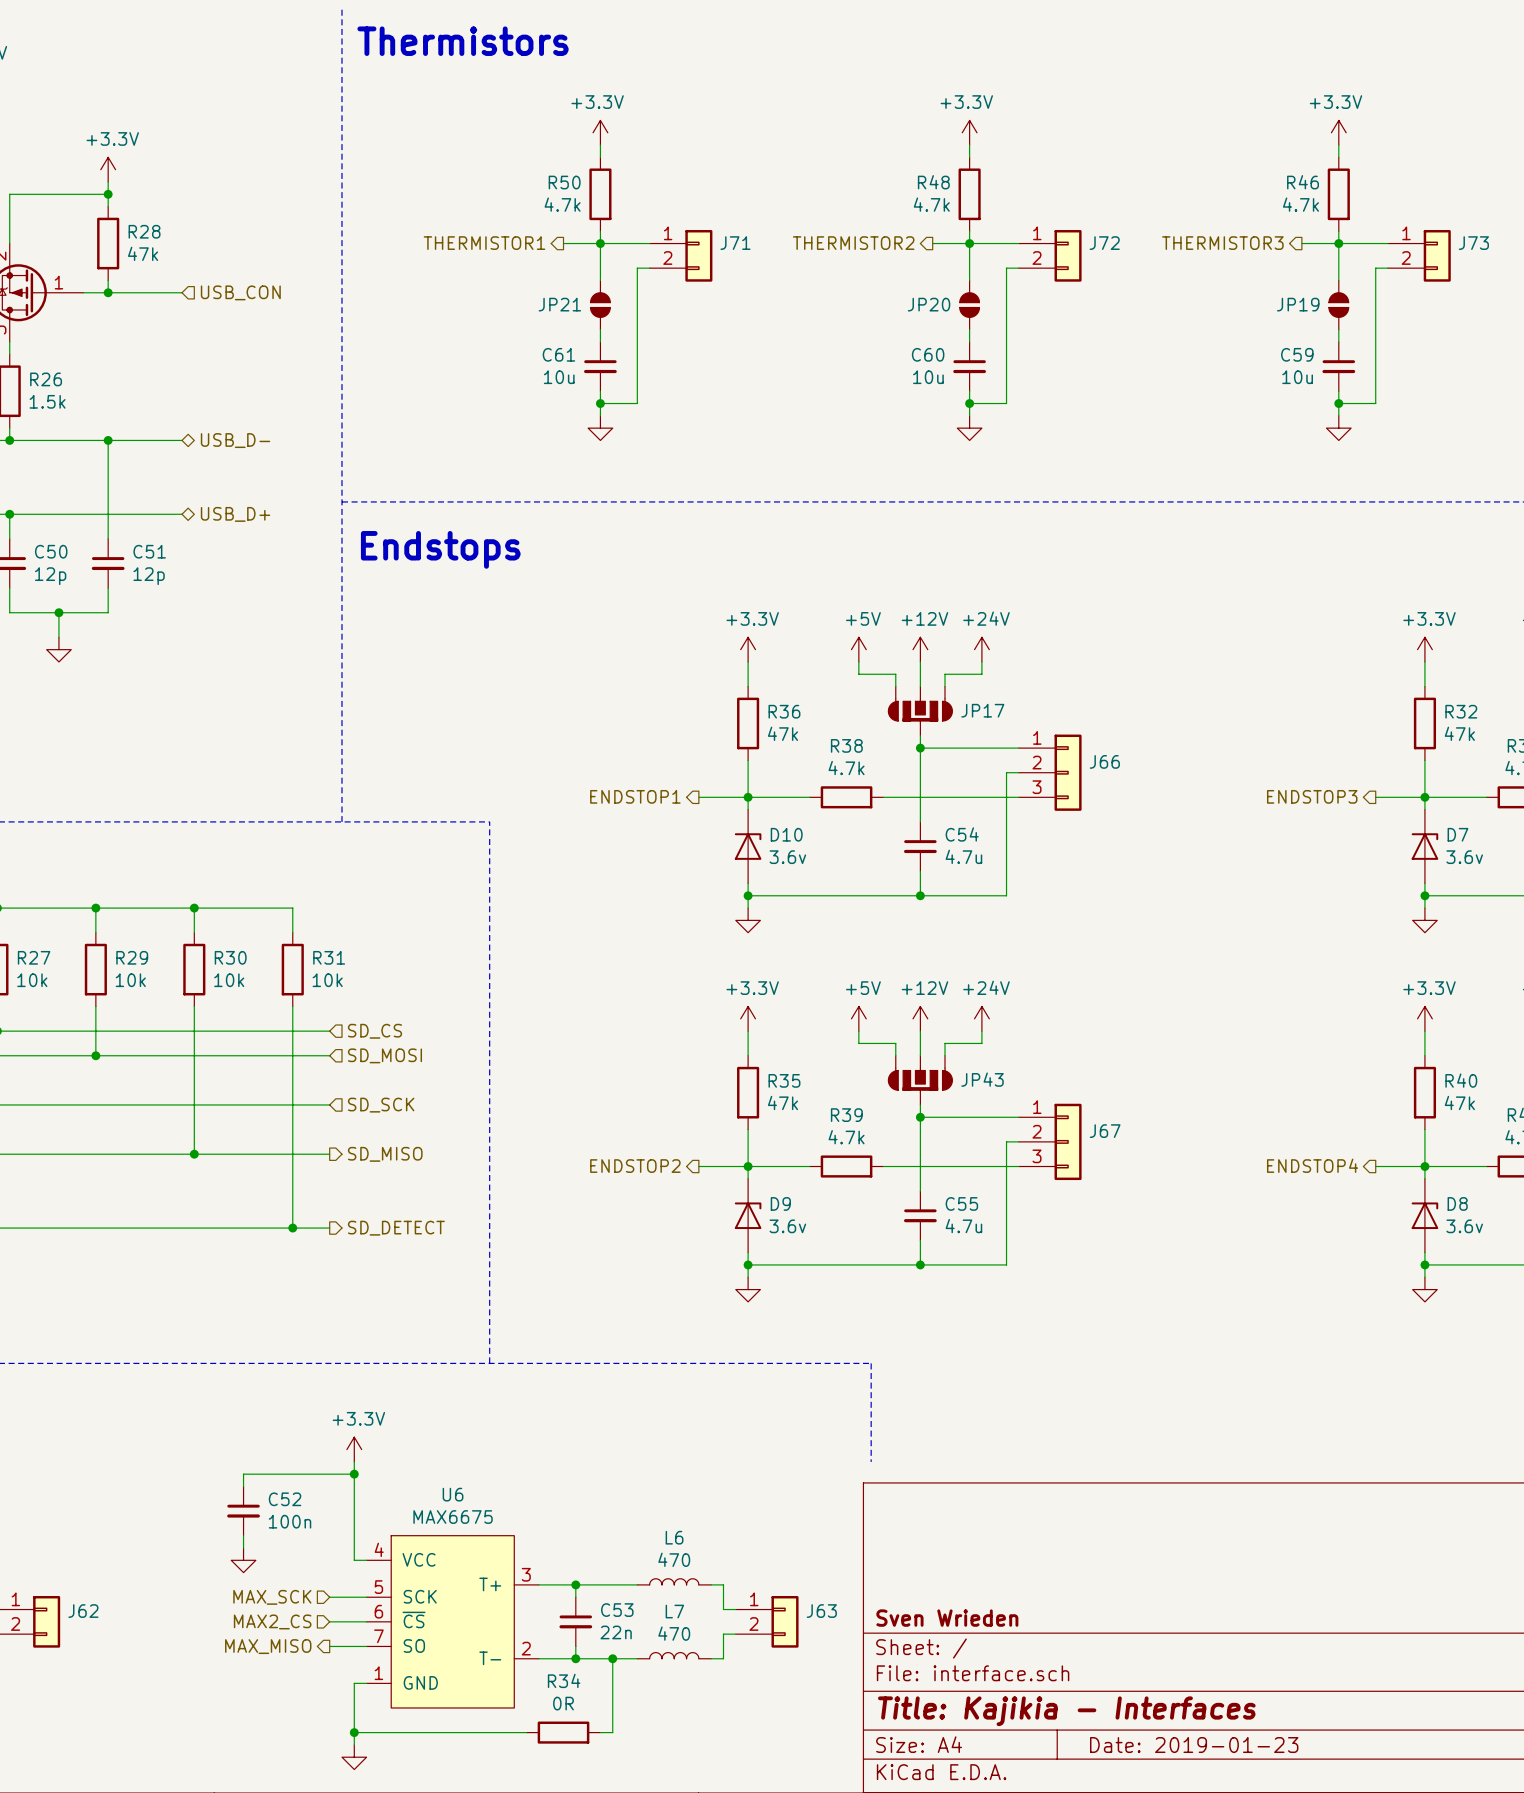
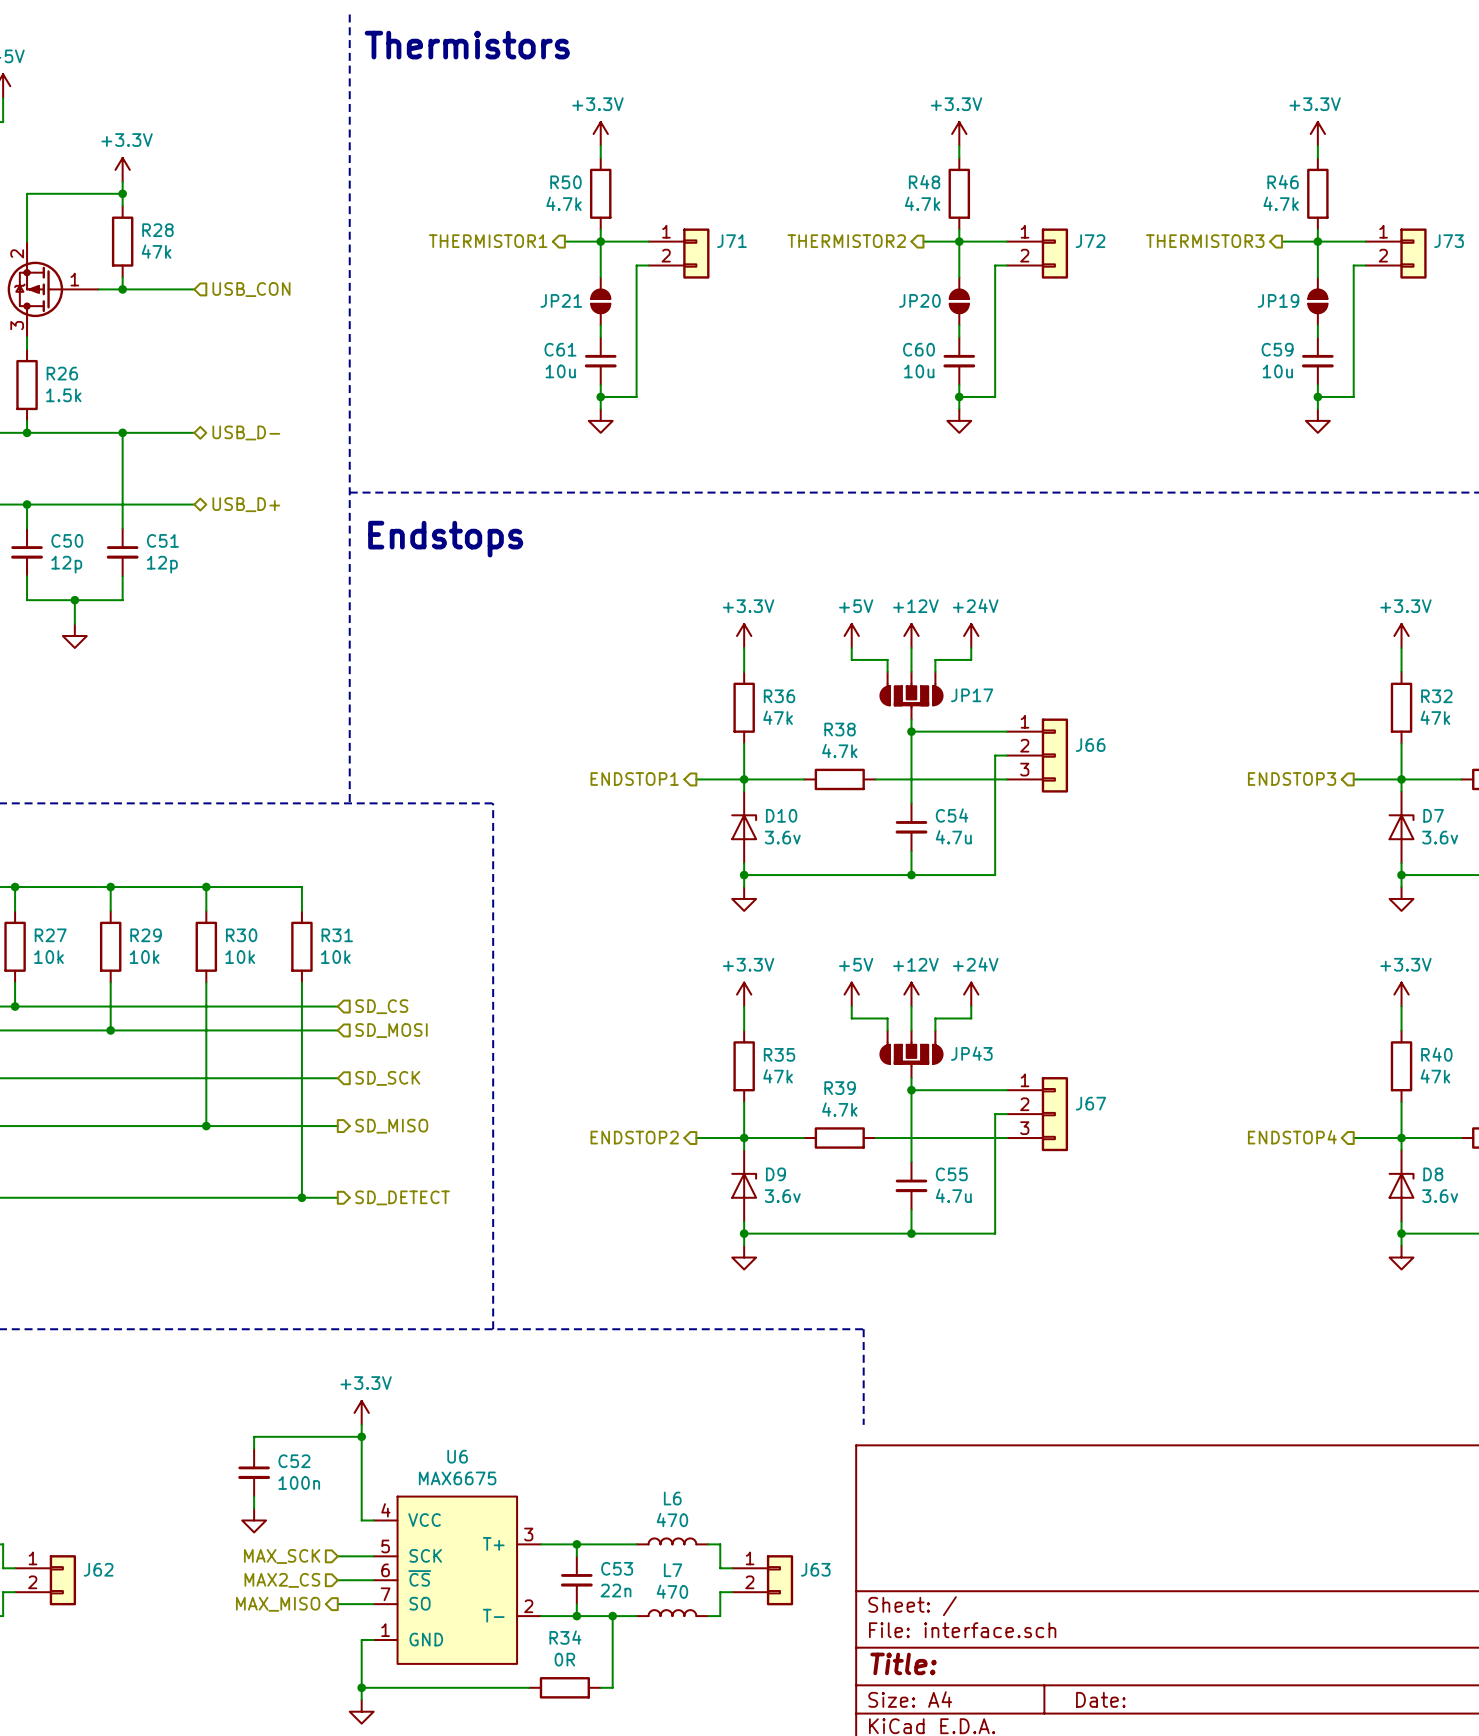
title block: Sven Wrieden (947, 1618) -> none
title block: Title: Kajikia - Interfaces (1066, 1711) -> Title: (903, 1663)
title block: Date: 2019-01-23 (1194, 1745) -> Date: (1100, 1699)

